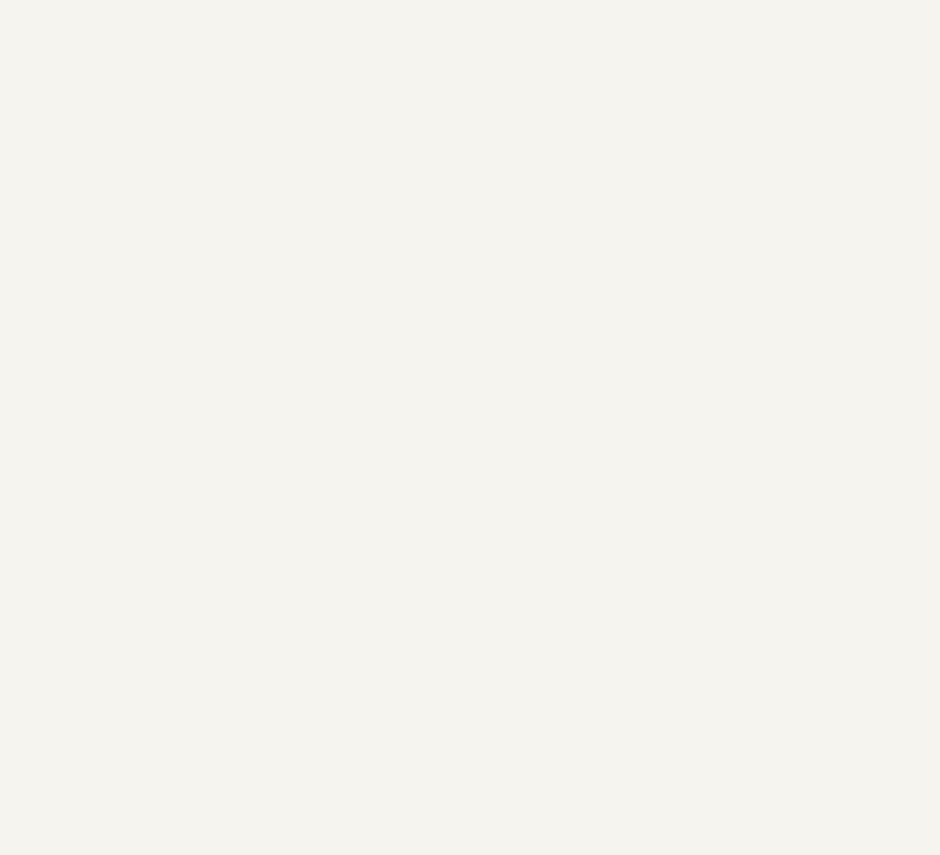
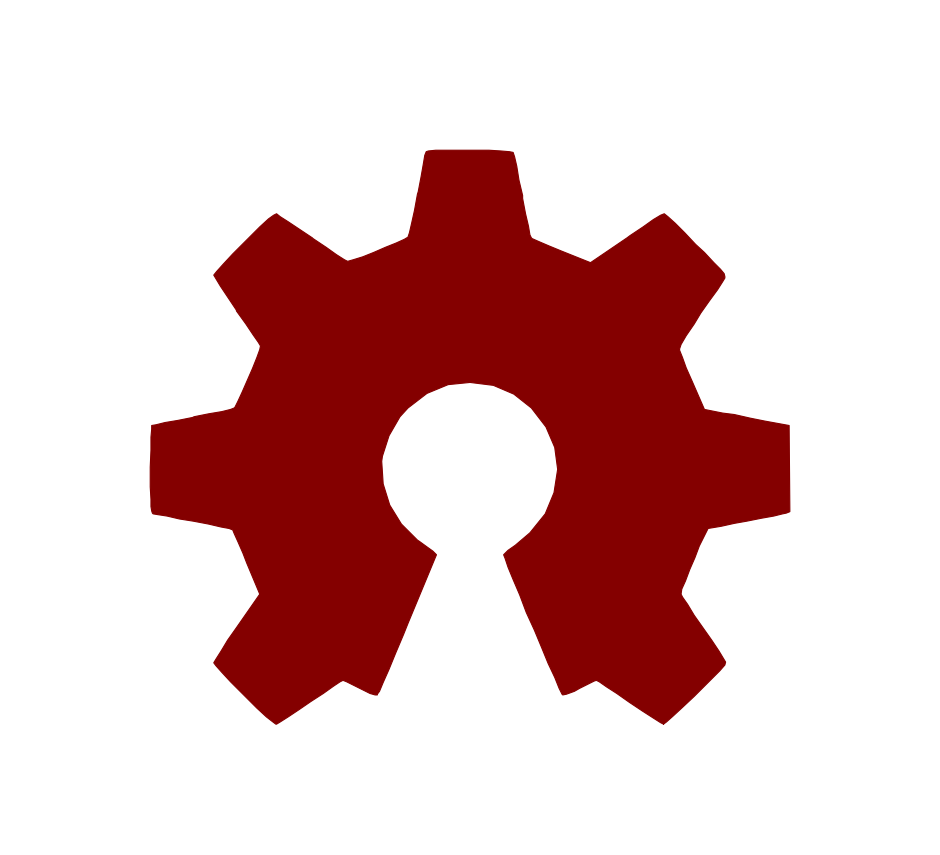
part: none -> (470, 437)

